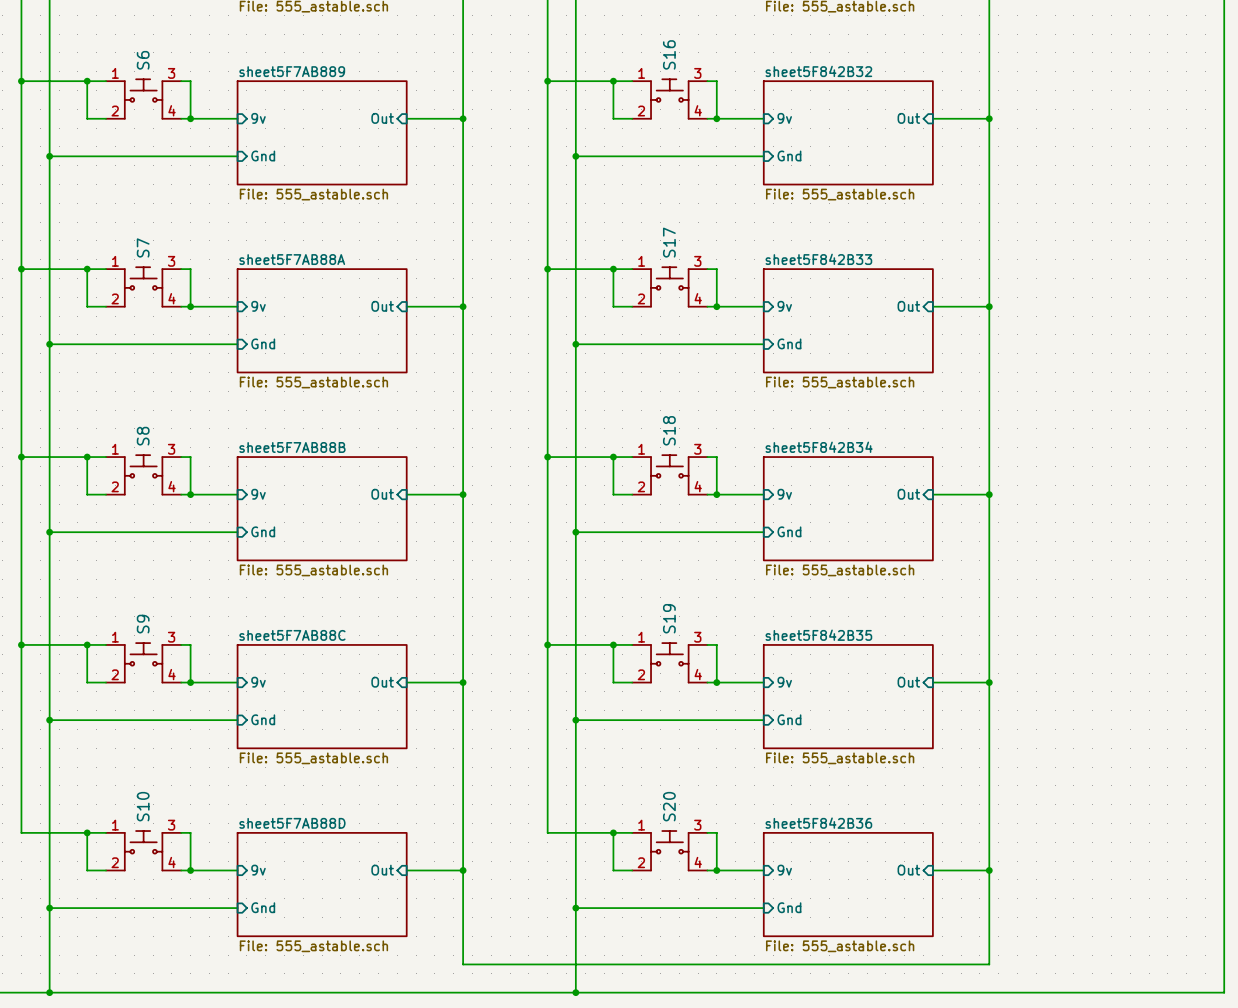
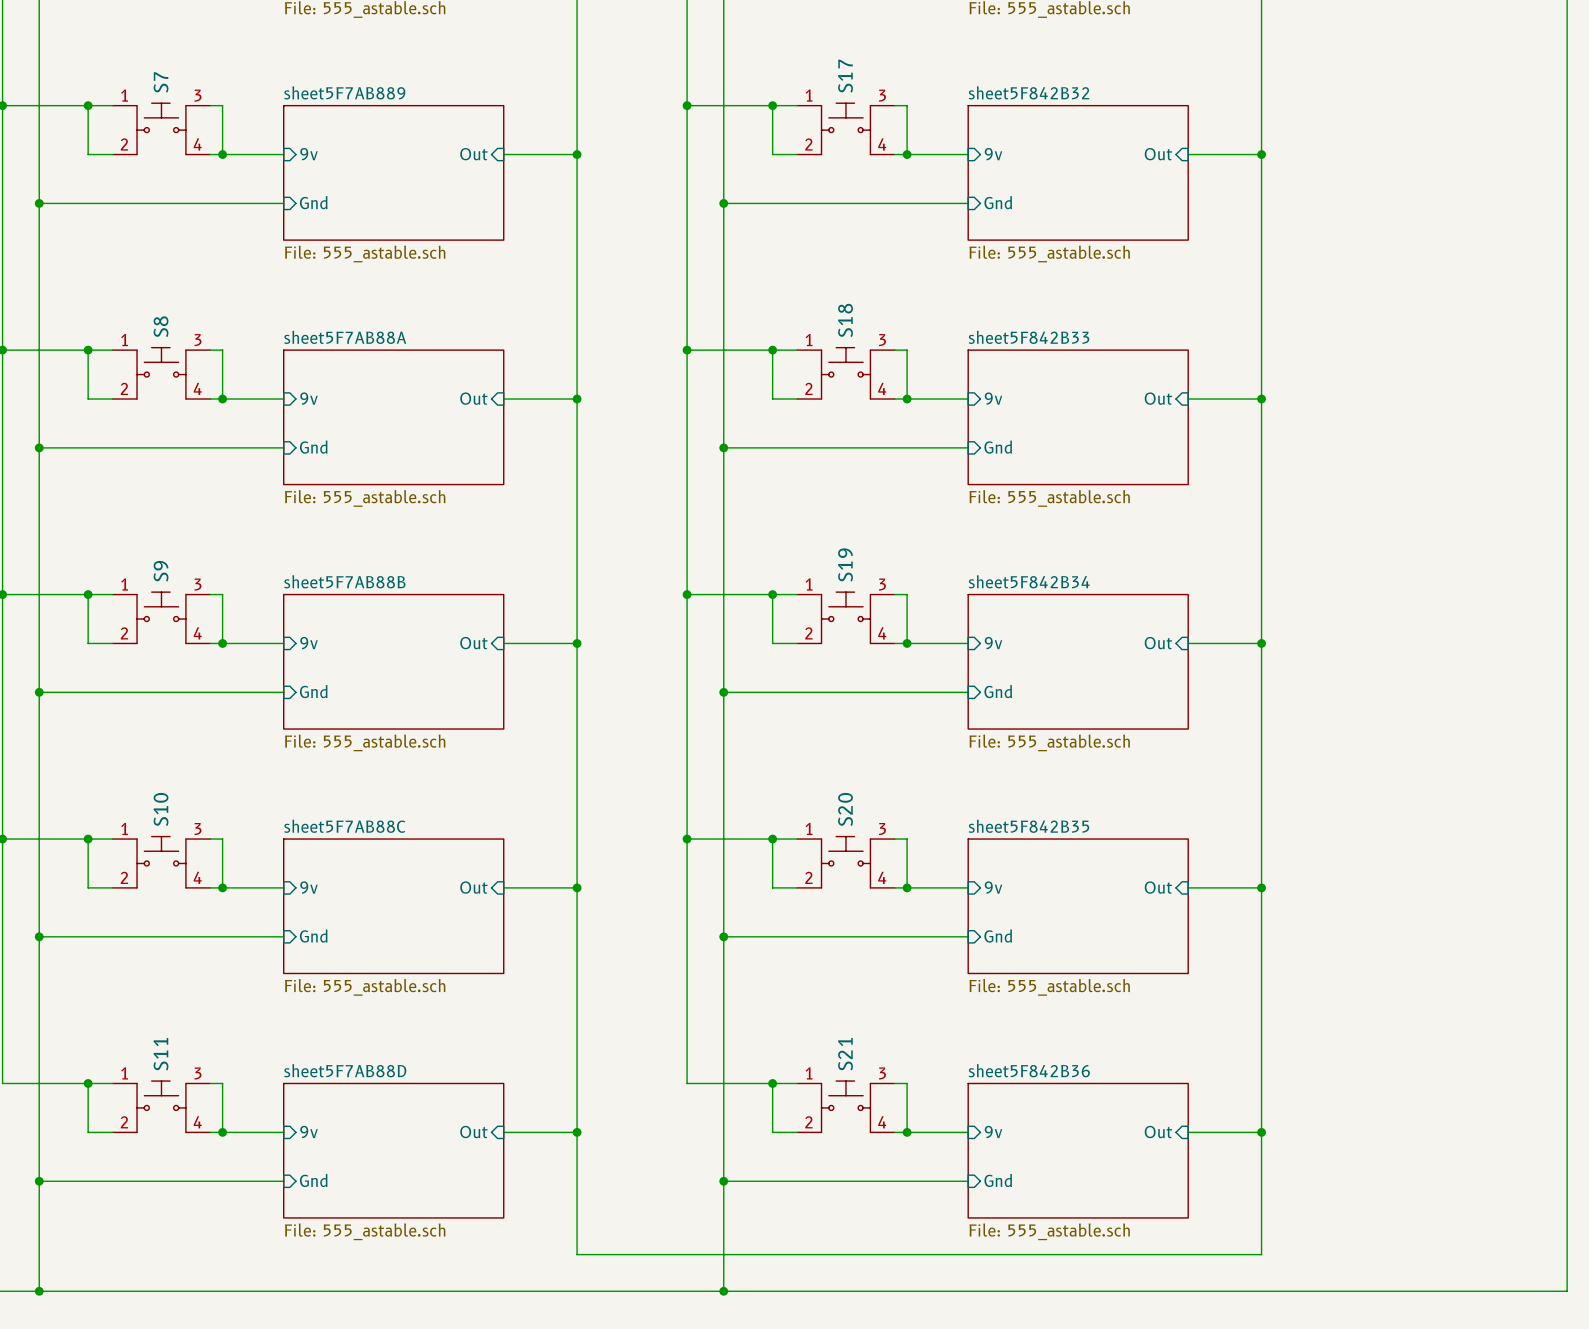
S16 name: S16 (669, 54) -> S17 (845, 76)
S6 name: S6 (143, 60) -> S7 (161, 82)
S17 name: S17 (669, 242) -> S18 (845, 320)
S7 name: S7 (143, 247) -> S8 (161, 326)
S18 name: S18 (669, 430) -> S19 (845, 564)
S8 name: S8 (143, 436) -> S9 (161, 571)
S19 name: S19 (669, 618) -> S20 (845, 809)
S9 name: S9 (143, 624) -> S10 (161, 809)
S10 name: S10 (143, 806) -> S11 (161, 1054)
S20 name: S20 (669, 806) -> S21 (845, 1054)

